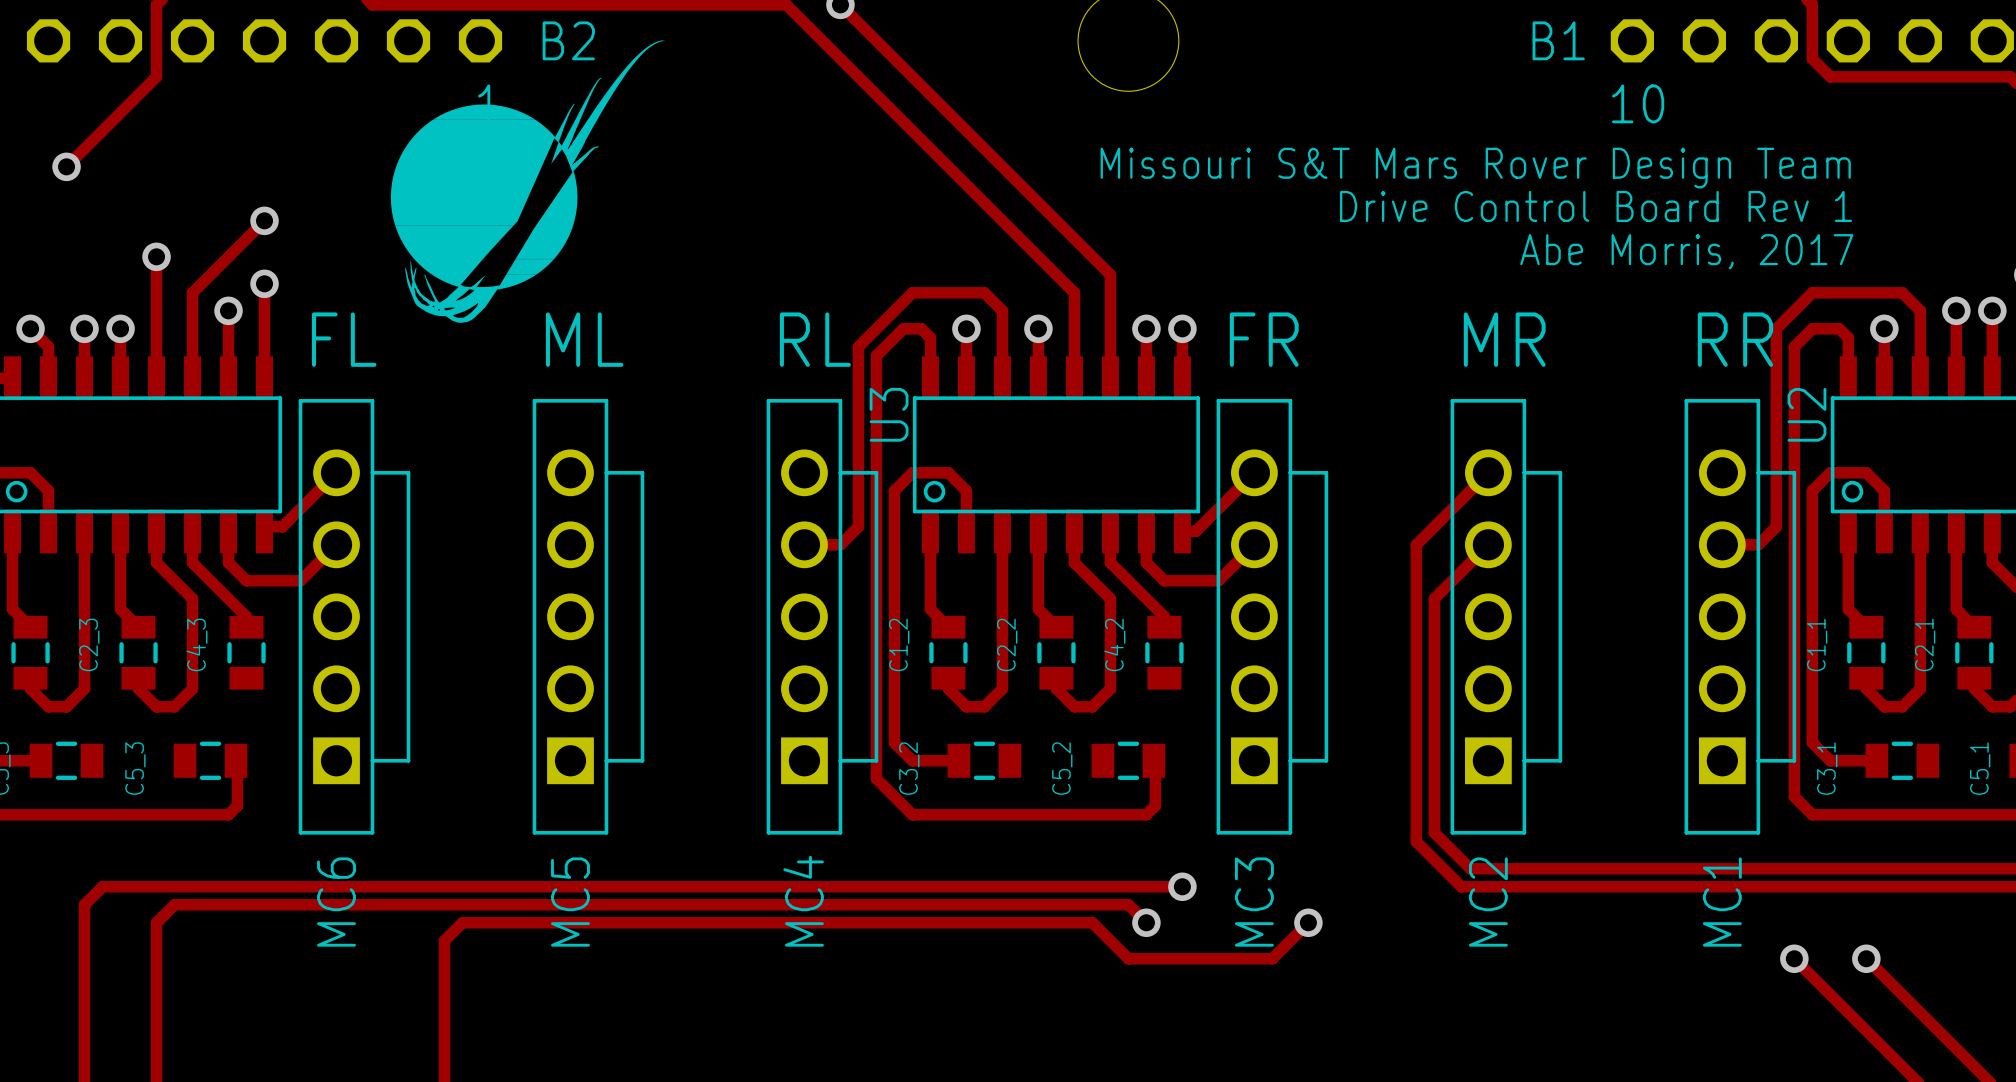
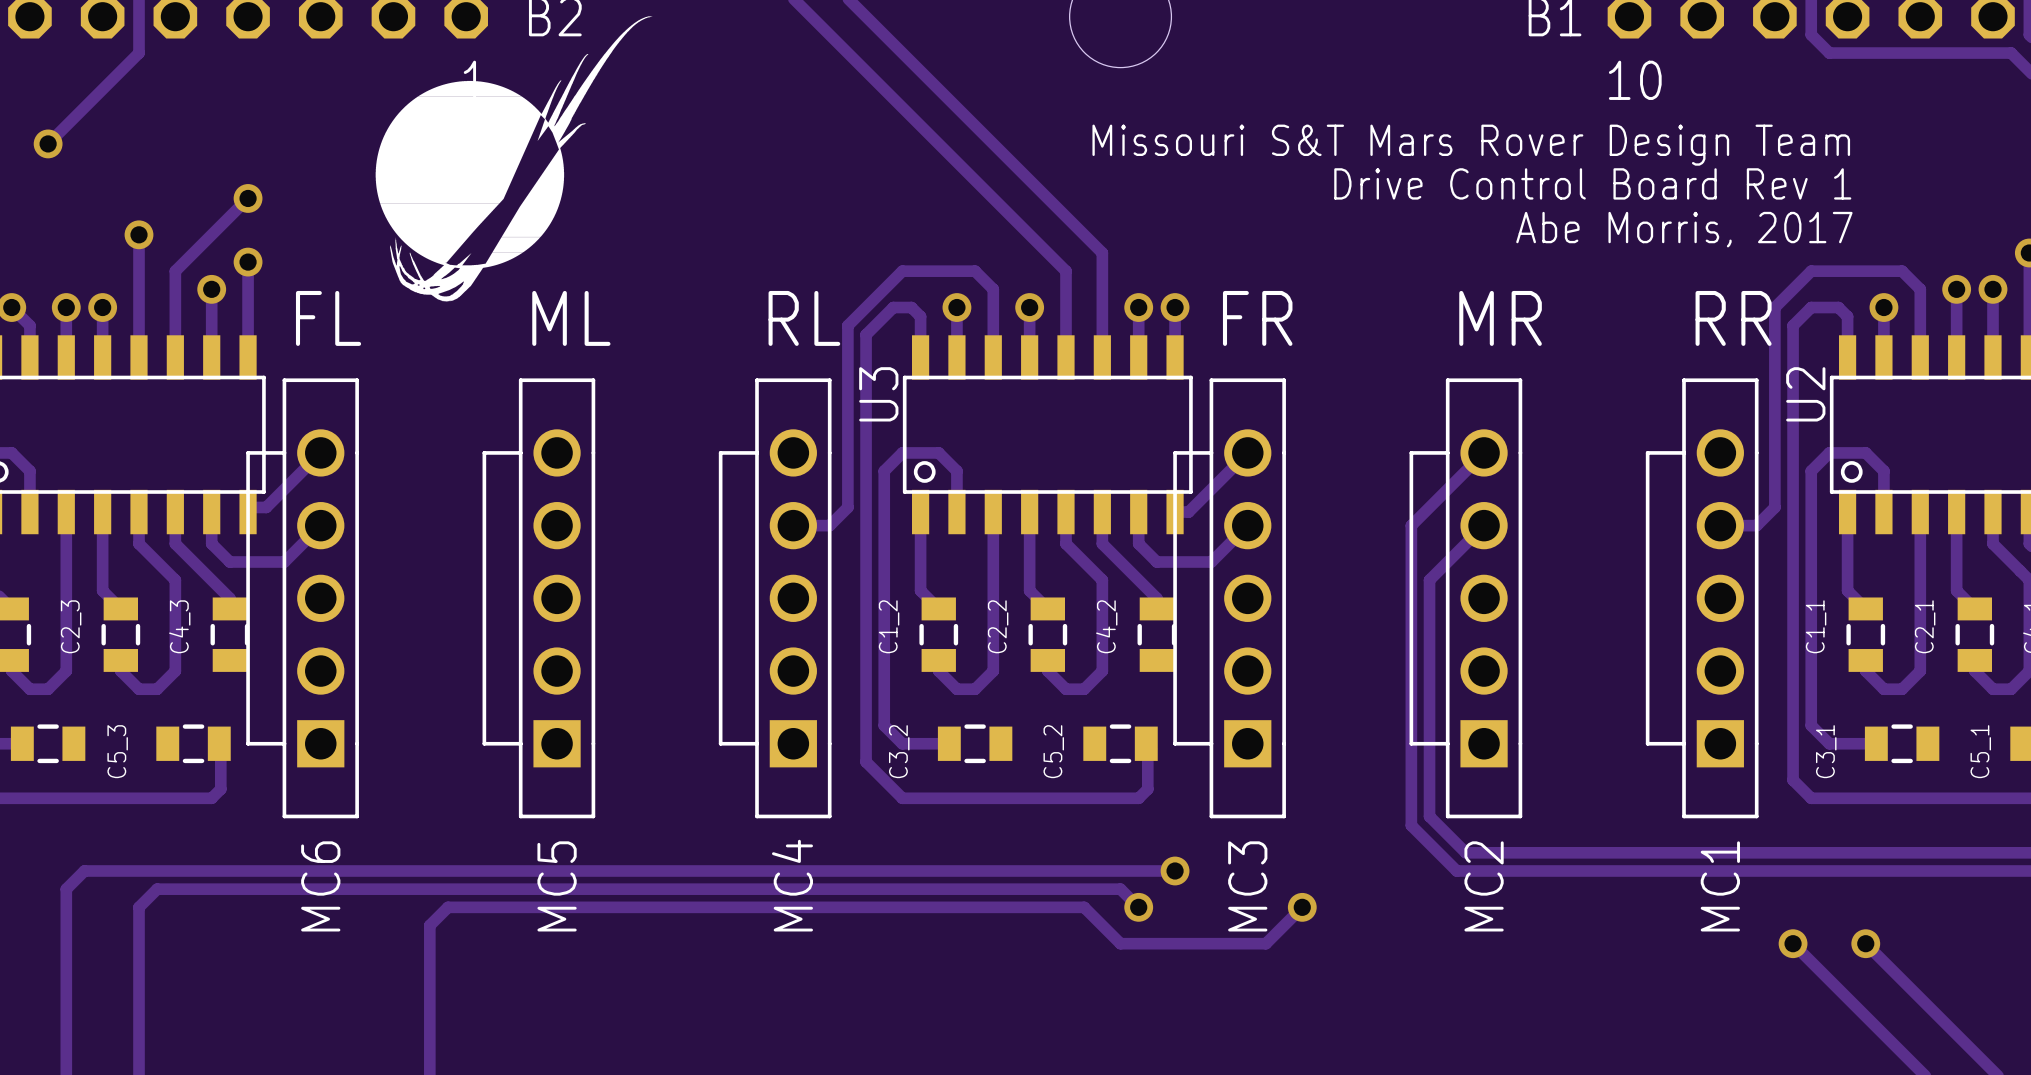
MC6 footprint: [298, 399, 411, 835] -> [246, 378, 359, 819]
MC5 footprint: [532, 399, 645, 835] -> [482, 378, 596, 819]
MC4 footprint: [766, 399, 879, 835] -> [718, 378, 832, 819]
MC3 footprint: [1216, 399, 1329, 835] -> [1173, 378, 1286, 819]
MC2 footprint: [1450, 399, 1563, 835] -> [1409, 378, 1523, 819]
MC1 footprint: [1684, 399, 1797, 835] -> [1645, 378, 1759, 819]

